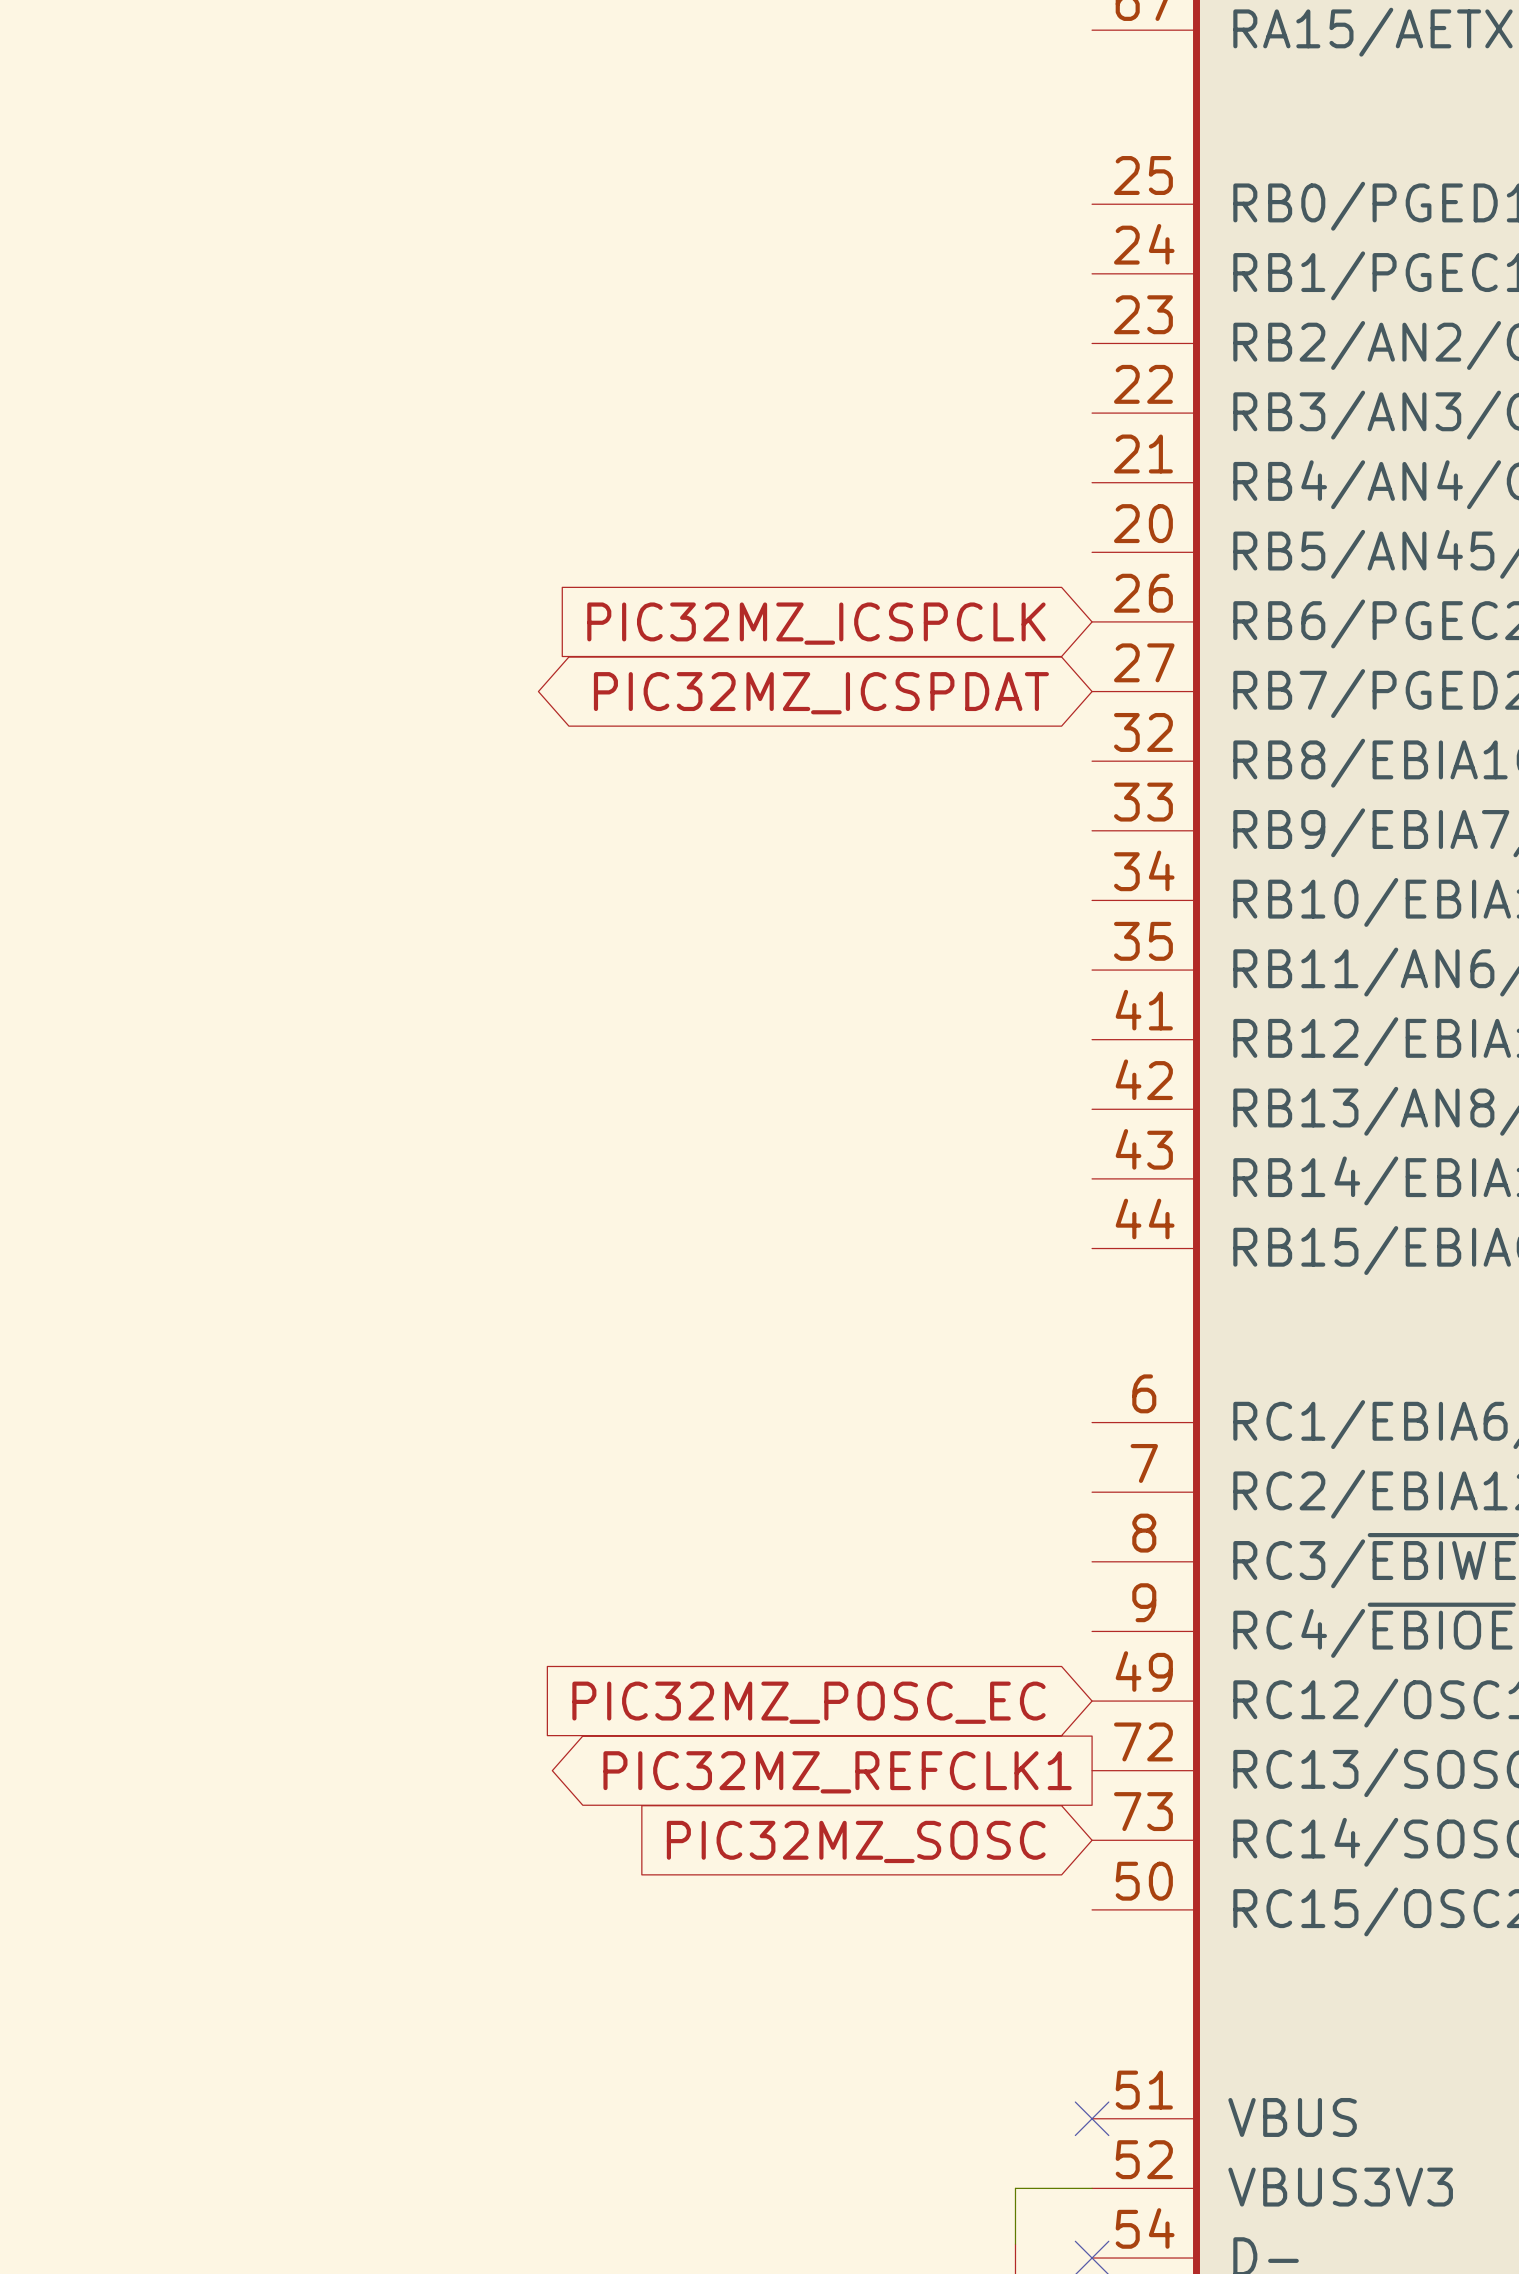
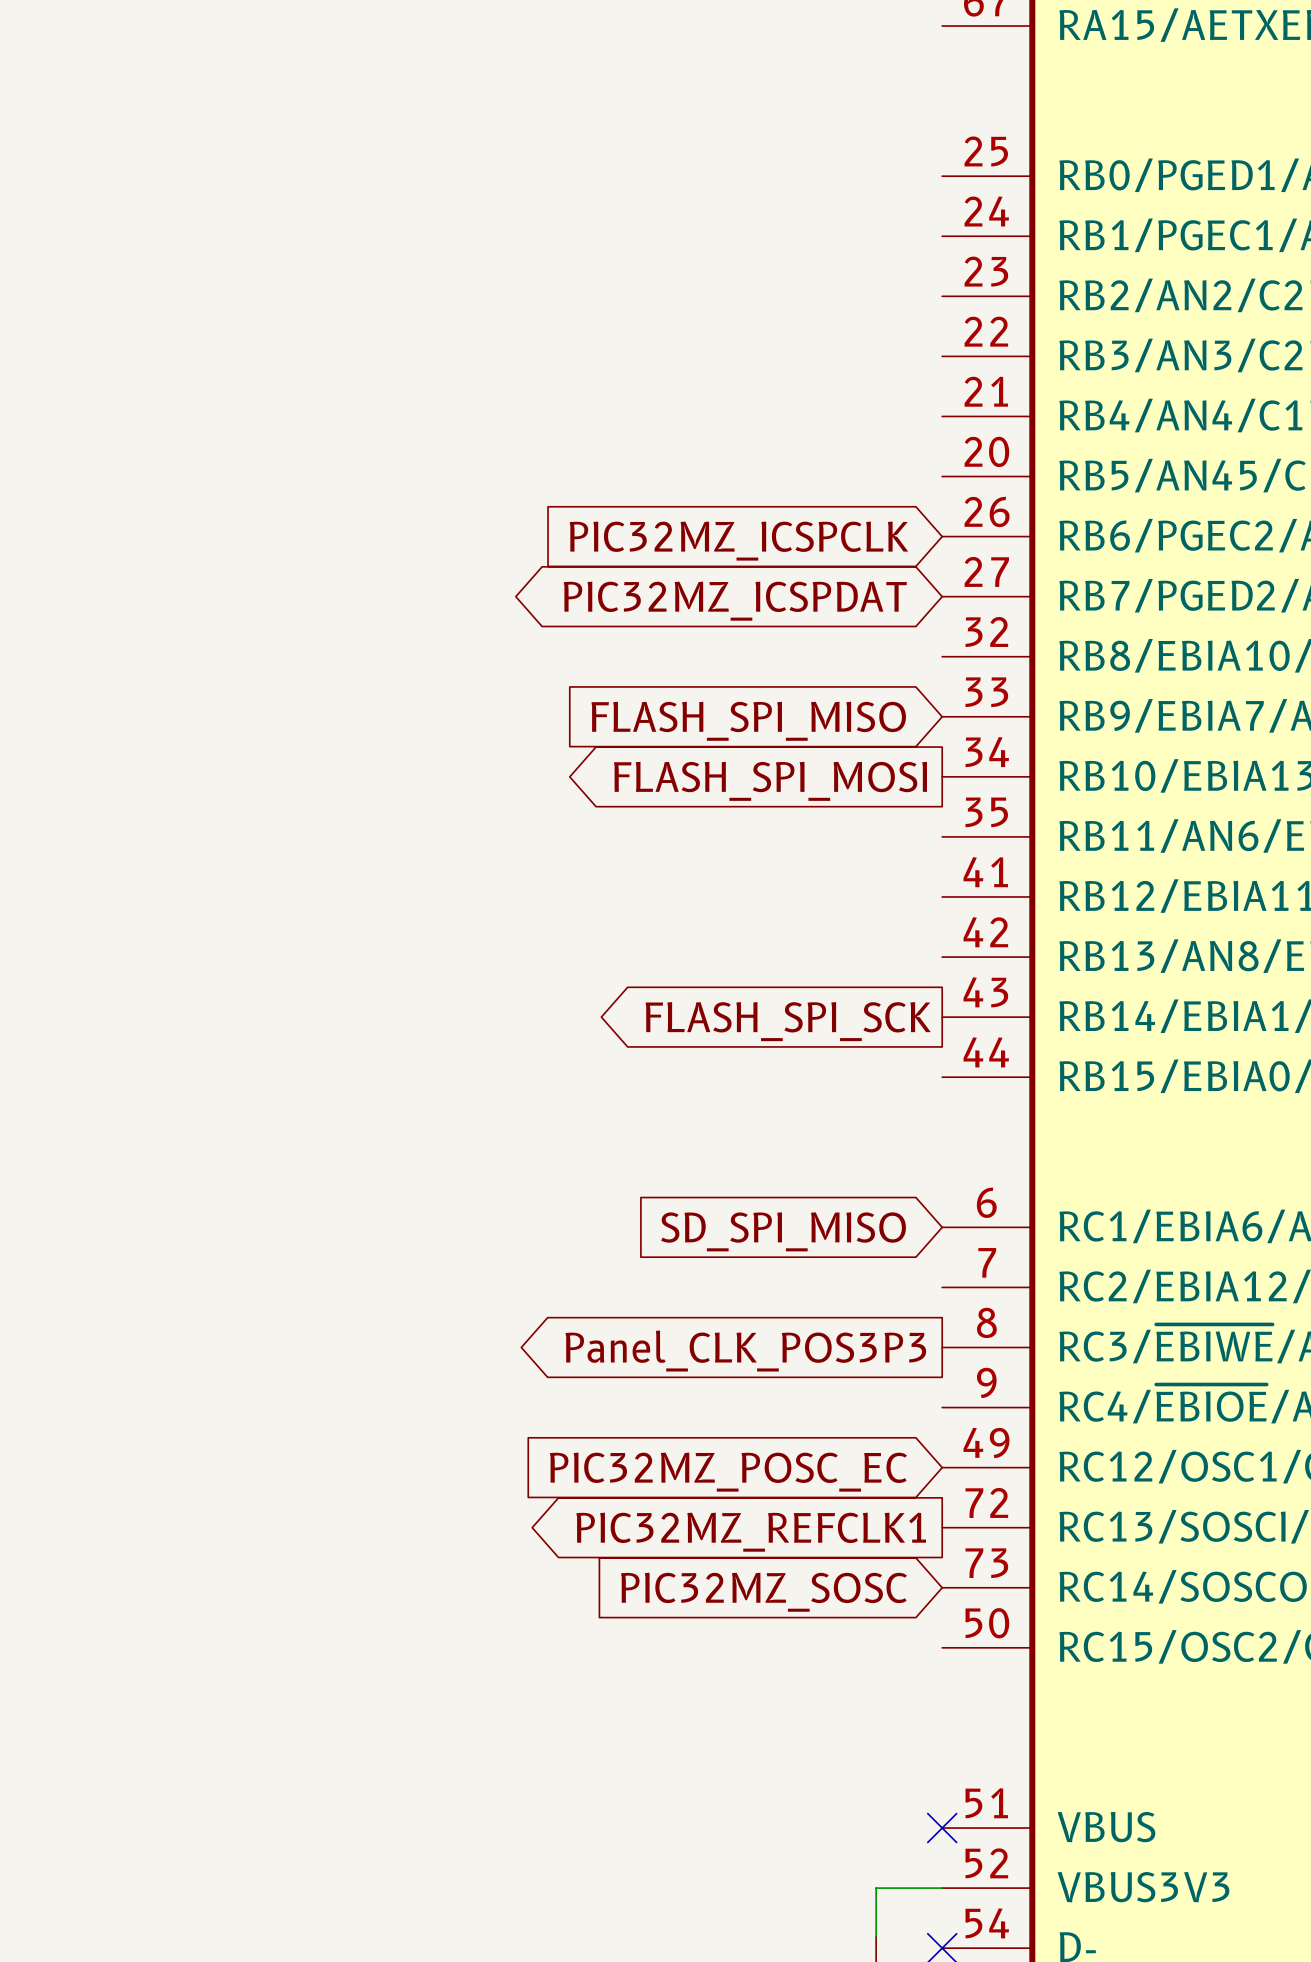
global label: none -> FLASH_SPI_MISO (748, 721)
global label: none -> FLASH_SPI_MOSI (770, 781)
global label: none -> FLASH_SPI_SCK (788, 1021)
global label: none -> SD_SPI_MISO (783, 1231)
global label: none -> Panel_CLK_POS3P3 (745, 1351)

